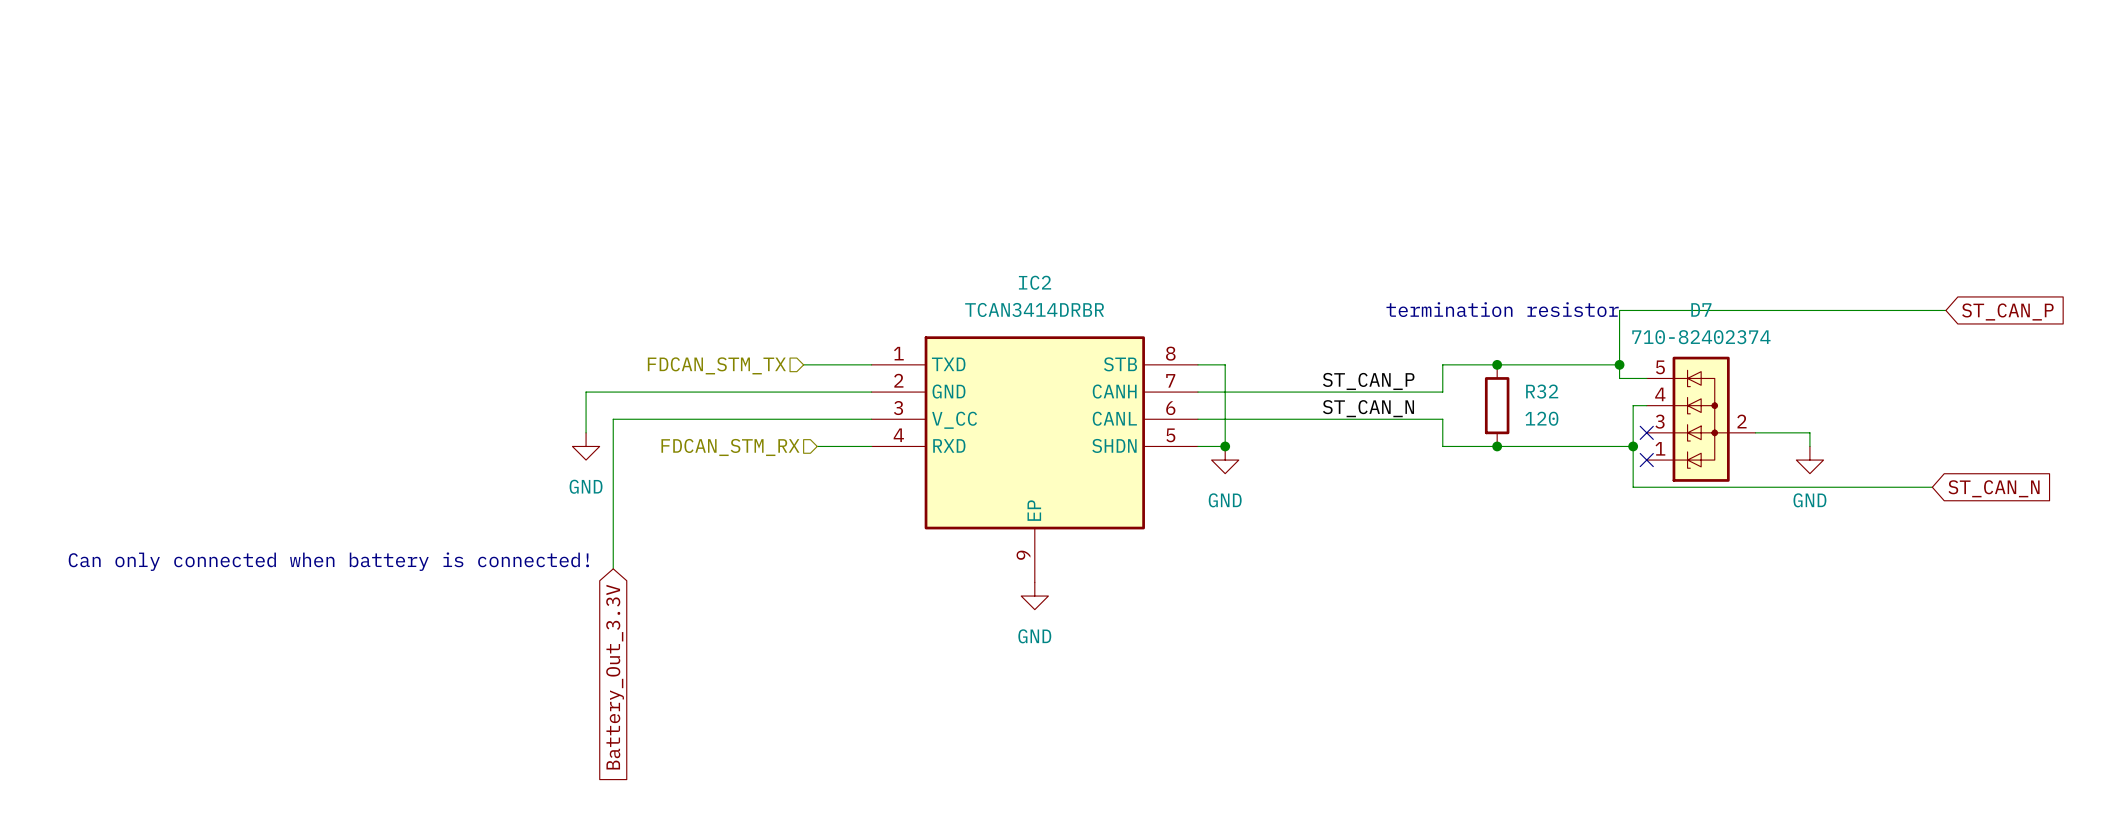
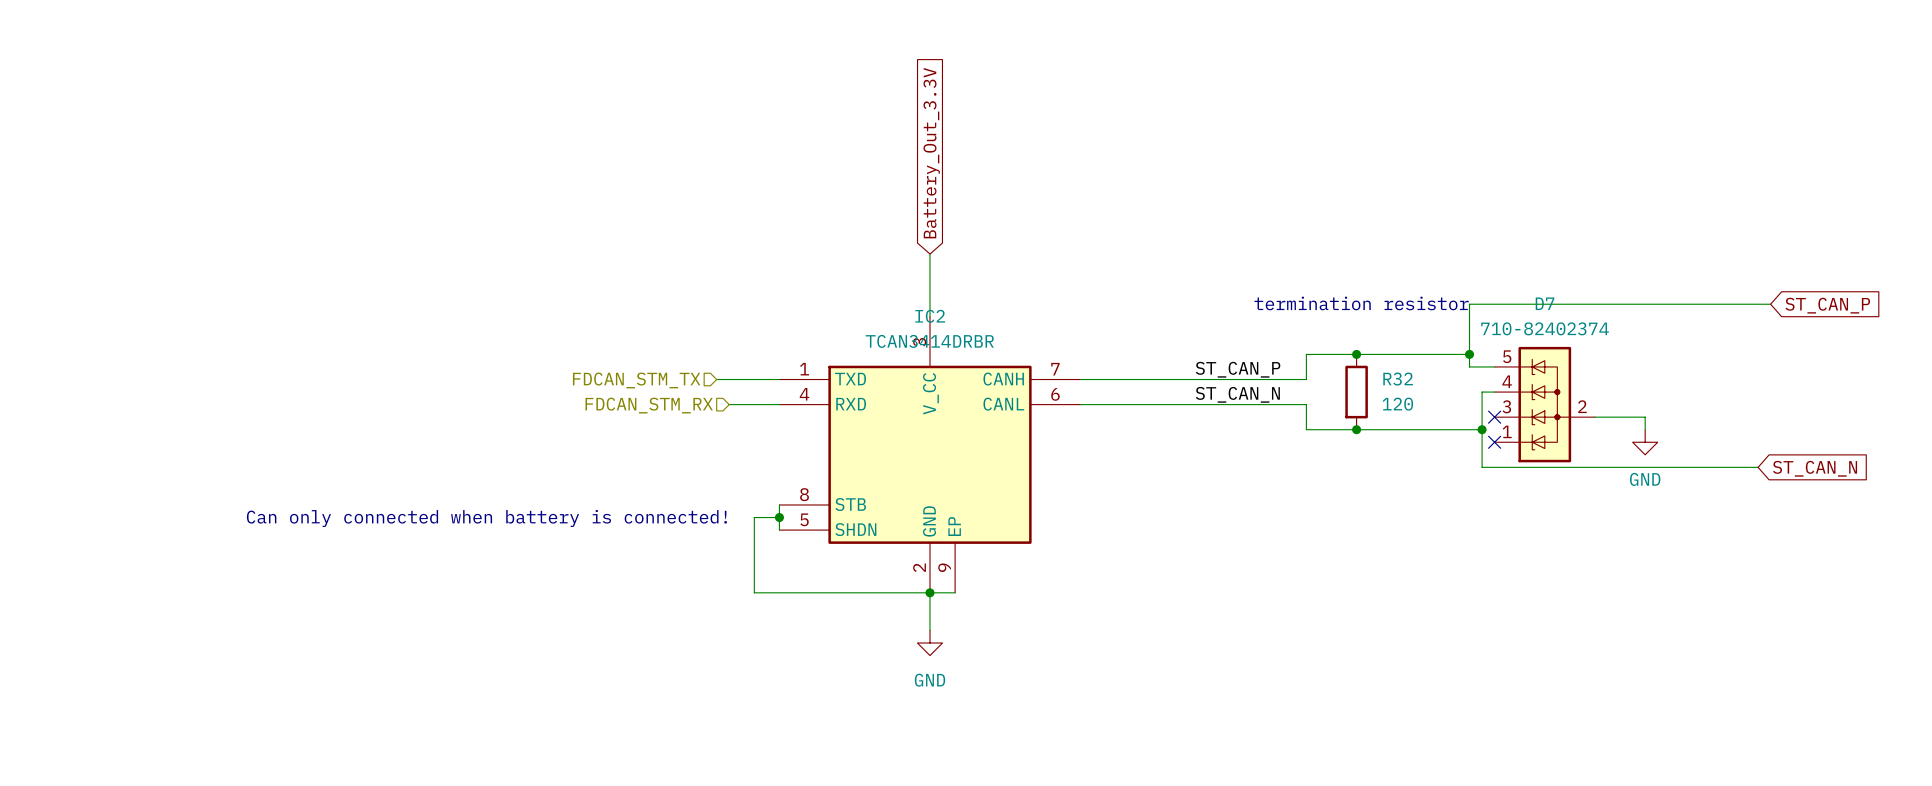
global label: none -> Battery_Out_3.3V (931, 153)
wire: none -> (929, 254) (929, 316)
IC2 name position: IC2 (1035, 282) -> IC2 (930, 316)
IC2 value position: TCAN3414DRBR (1034, 309) -> TCAN3414DRBR (929, 341)
IC2 symbol: [871, 336, 1198, 583] -> [779, 316, 1081, 593]
wire: (803, 364) (871, 364) -> none
wire: (1197, 364) (1225, 364) (1225, 446) (1197, 446) -> none
hierarchical label position: FDCAN_STM_TX (716, 365) -> FDCAN_STM_TX (636, 380)
wire: (803, 392) (586, 392) (586, 432) -> none
wire: (817, 419) (613, 419) (613, 568) -> none
power symbol: GND (586, 446) -> none
wire: (817, 446) (871, 446) -> none
junction: (1225, 446) -> none
hierarchical label position: FDCAN_STM_RX (730, 447) -> FDCAN_STM_RX (649, 405)
power symbol: GND (1225, 460) -> none
wire: none -> (779, 504) (779, 530)
wire: none -> (779, 517) (754, 517) (754, 592) (955, 592)
junction: none -> (779, 517)
text position: Can only connected when battery is connected! (328, 561) -> Can only connected when battery is connected! (486, 518)
power symbol position: GND (1034, 596) -> GND (929, 643)
wire: none -> (929, 592) (929, 630)
junction: none -> (929, 592)
global label: Battery_Out_3.3V (615, 677) -> none

